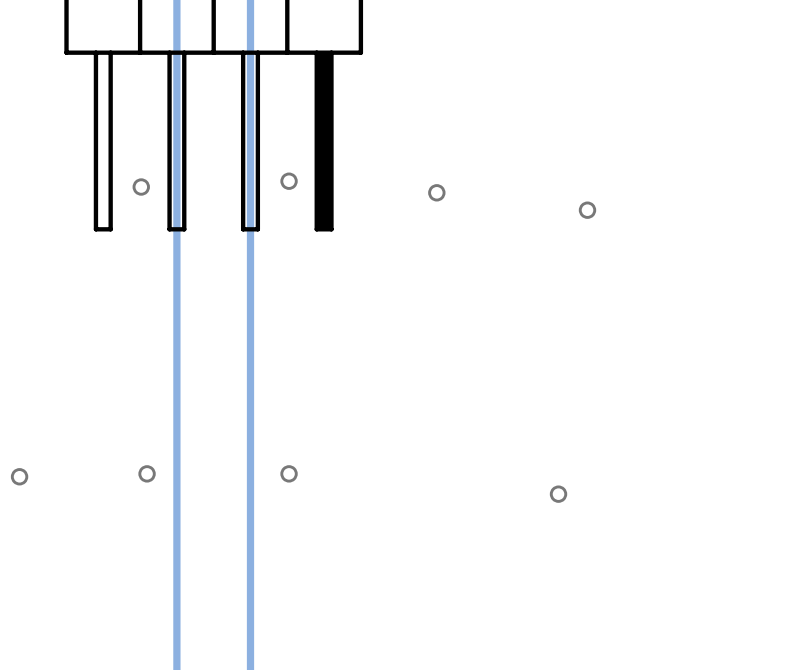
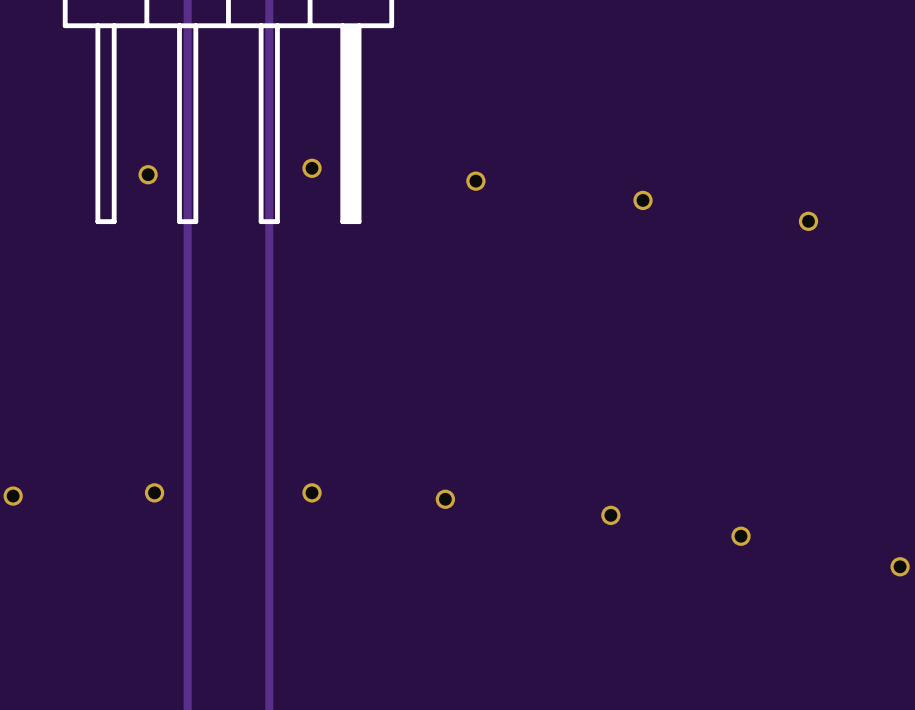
via: none -> (808, 221)
via: none -> (445, 499)
via: none -> (741, 536)

